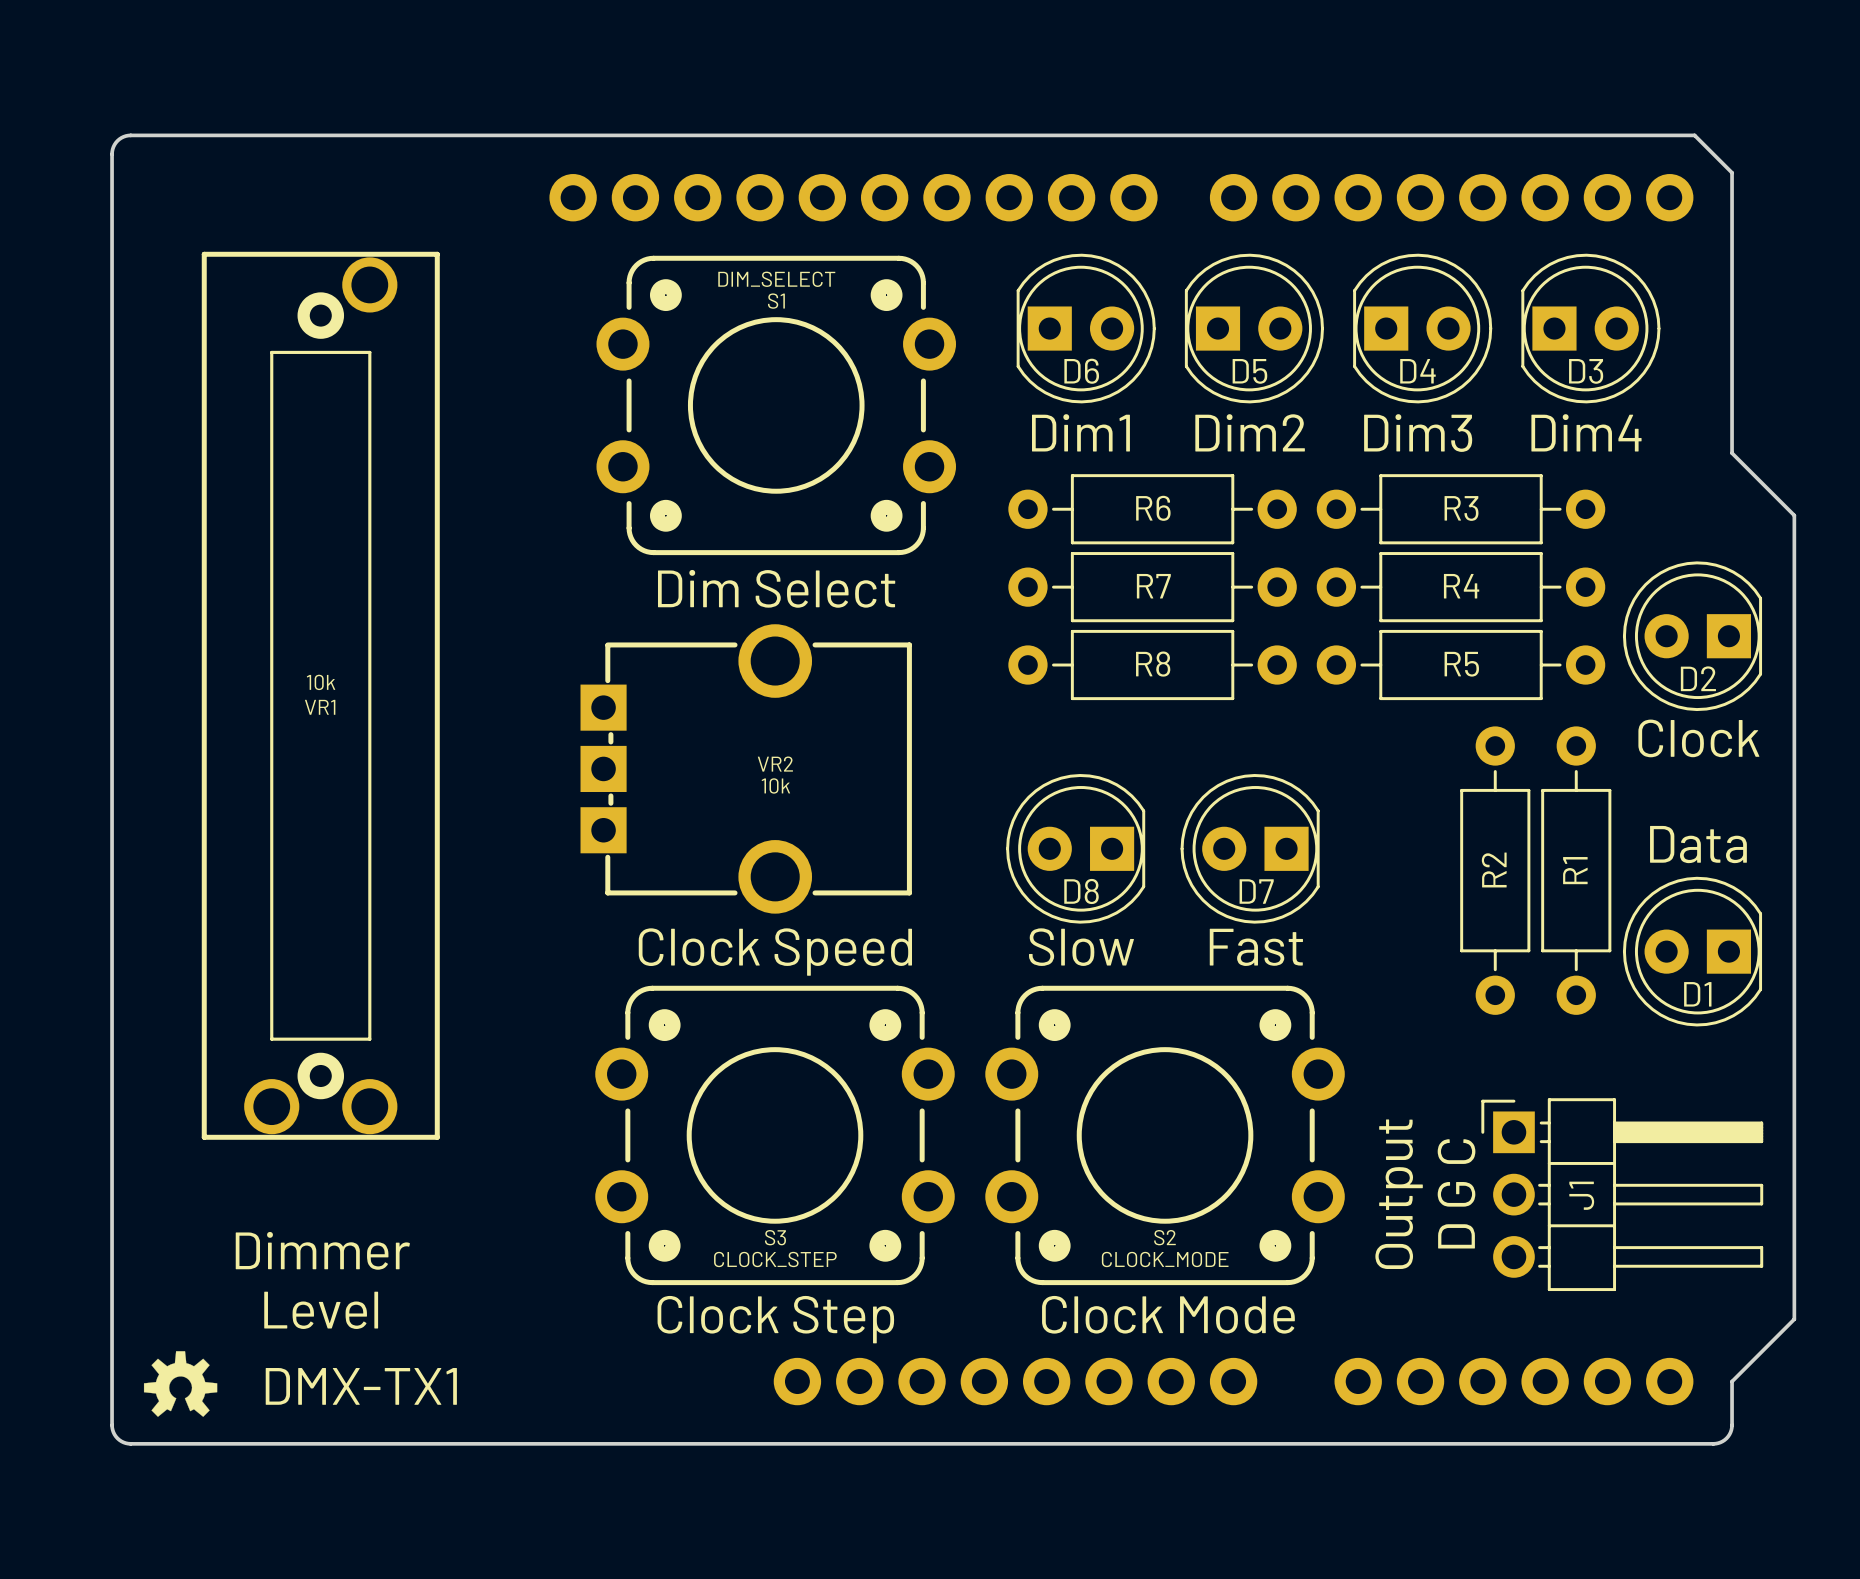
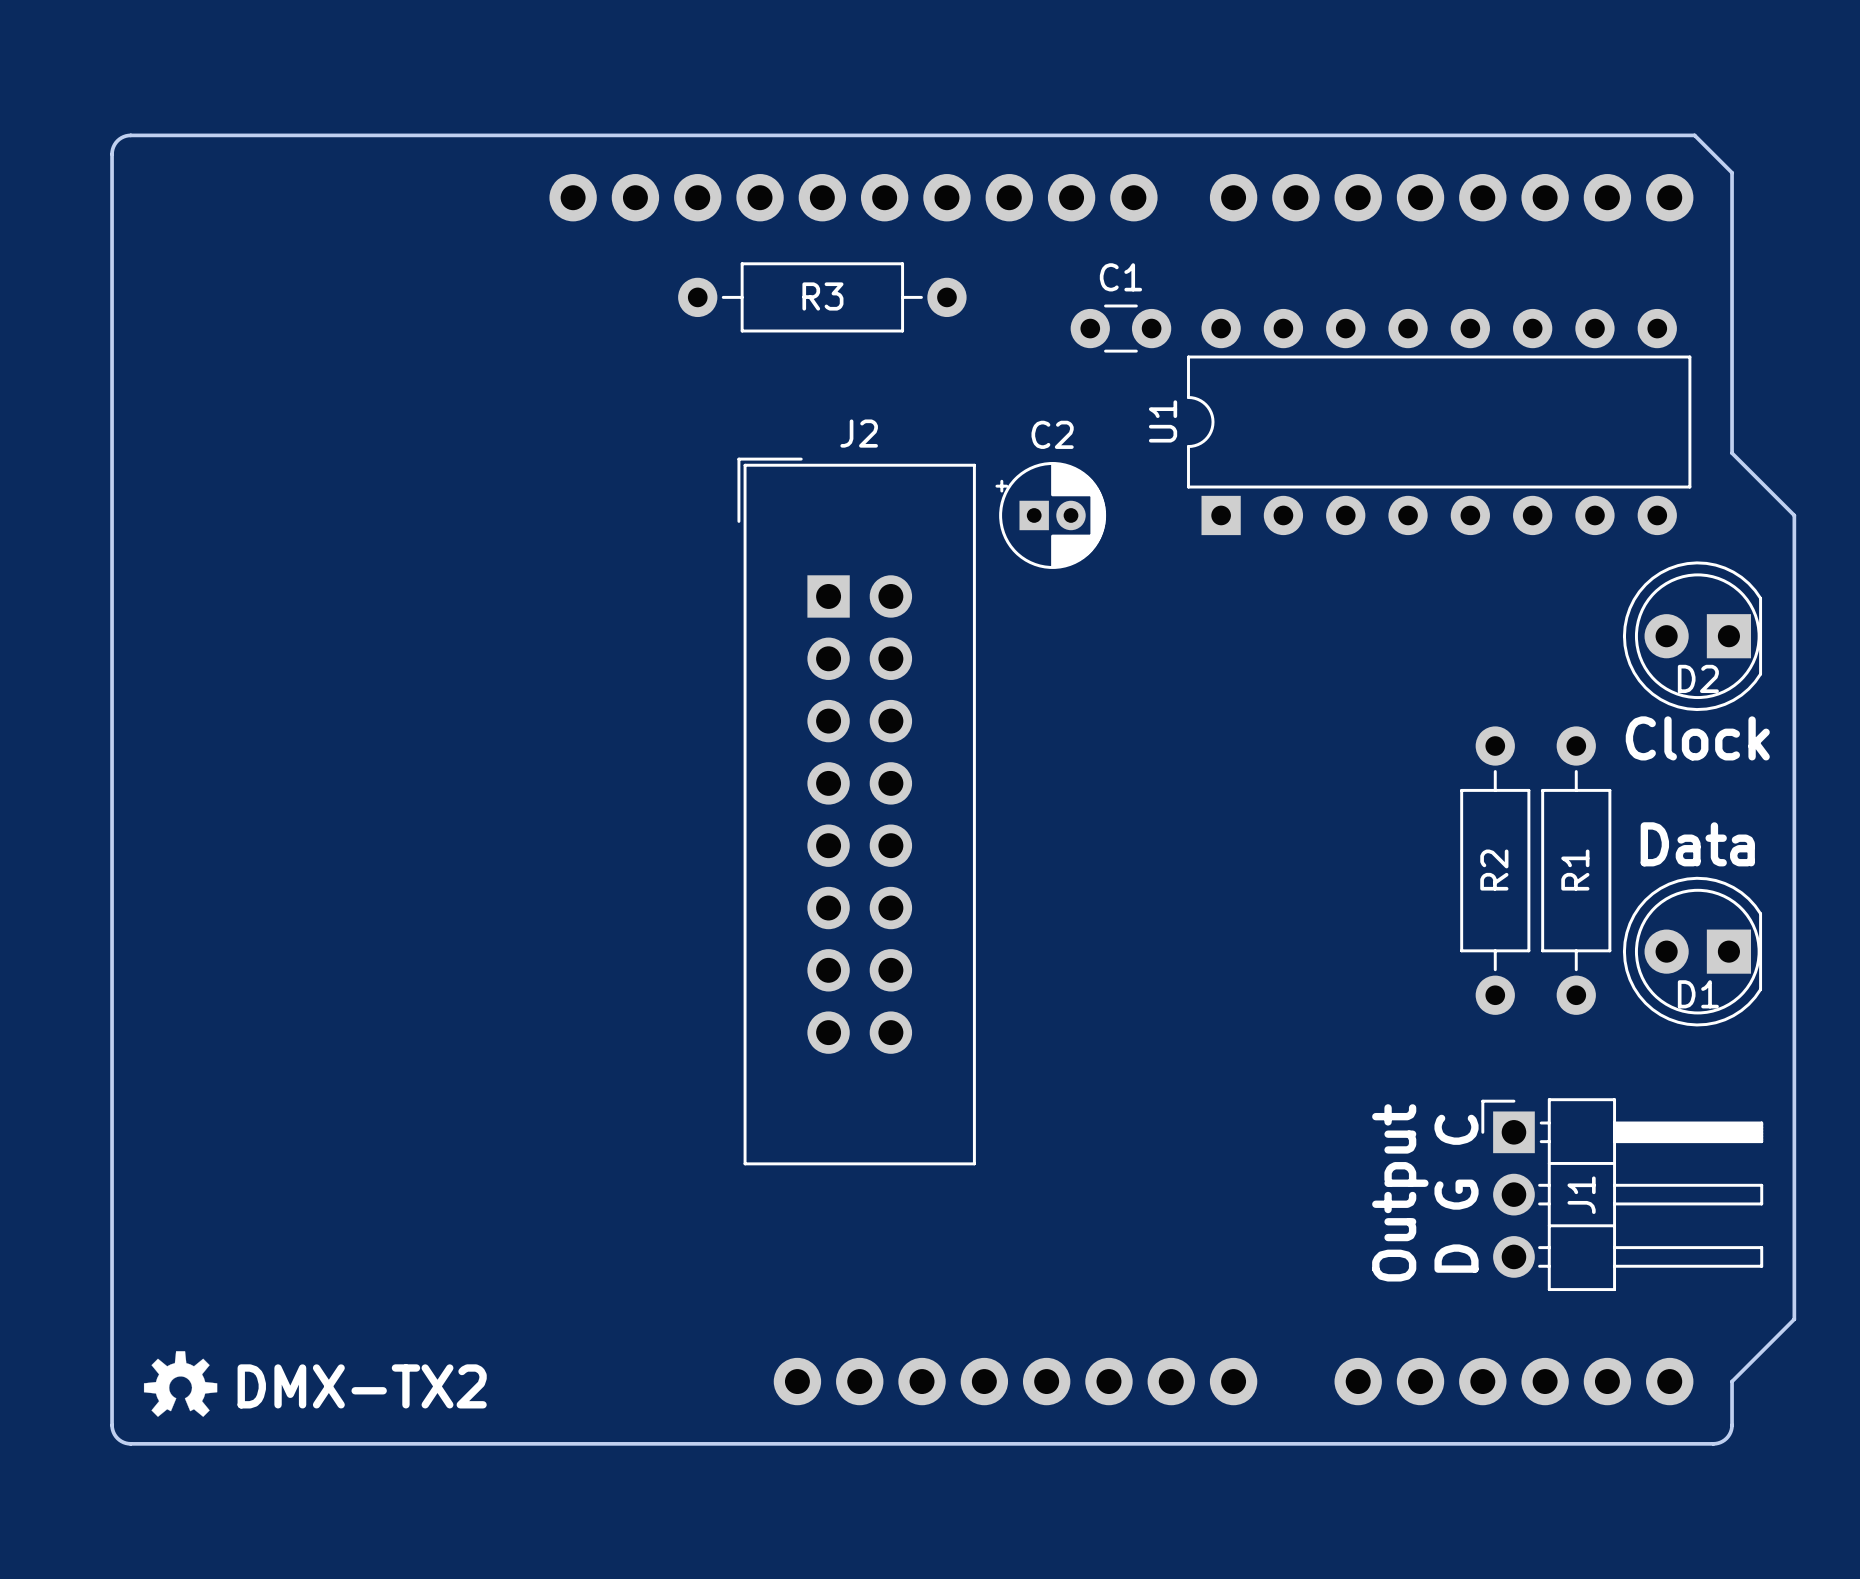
D6: (1086, 328) -> none
C1: none -> (1120, 328)
D5: (1254, 328) -> none
D4: (1422, 328) -> none
D3: (1590, 328) -> none
S1: DIM_SELECT (776, 405) -> none
U1: none -> (1439, 422)
text: Dim1 (1080, 432) -> none
text: Dim2 (1250, 432) -> none
text: Dim4 (1586, 432) -> none
text: Dim3 (1418, 433) -> none
R6: (1152, 509) -> none
R3 position: (1461, 509) -> (822, 297)
C2: none -> (1050, 515)
R7: (1152, 587) -> none
R4: (1461, 587) -> none
text: Dim Select (776, 588) -> none
R8: (1152, 665) -> none
R5: (1461, 665) -> none
VR1: 10k (320, 695) -> none
VR2: 10k (746, 768) -> none
J2: none -> (856, 811)
D8: (1075, 848) -> none
D7: (1250, 848) -> none
text: Slow (1081, 947) -> none
text: Fast (1256, 947) -> none
text: Clock Speed (775, 952) -> none
S3: CLOCK_STEP (775, 1135) -> none
S2: CLOCK_MODE (1165, 1135) -> none
text: Dimmer (322, 1250) -> none
text: Level (321, 1310) -> none
text: Clock Mode (1168, 1314) -> none
text: Clock Step (775, 1319) -> none
text: DMX-TX1 (361, 1386) -> DMX-TX2 (362, 1386)

